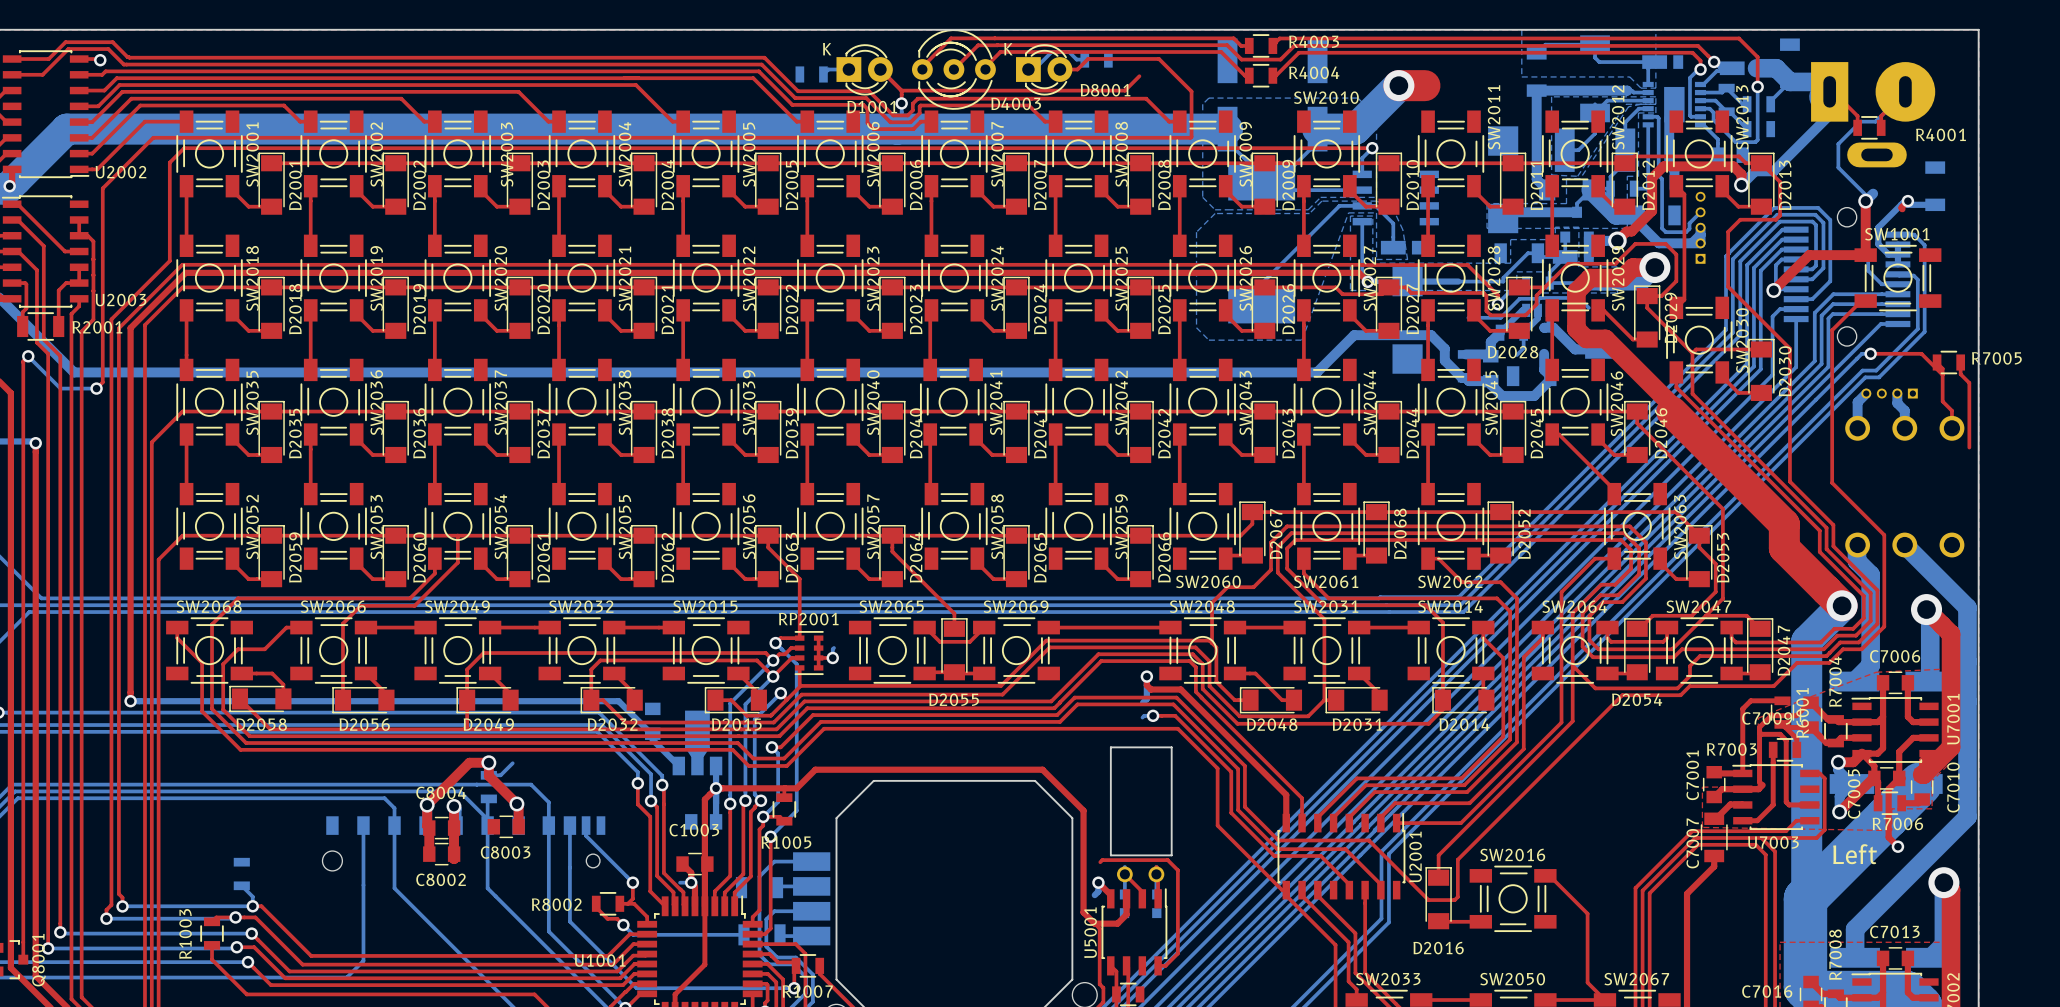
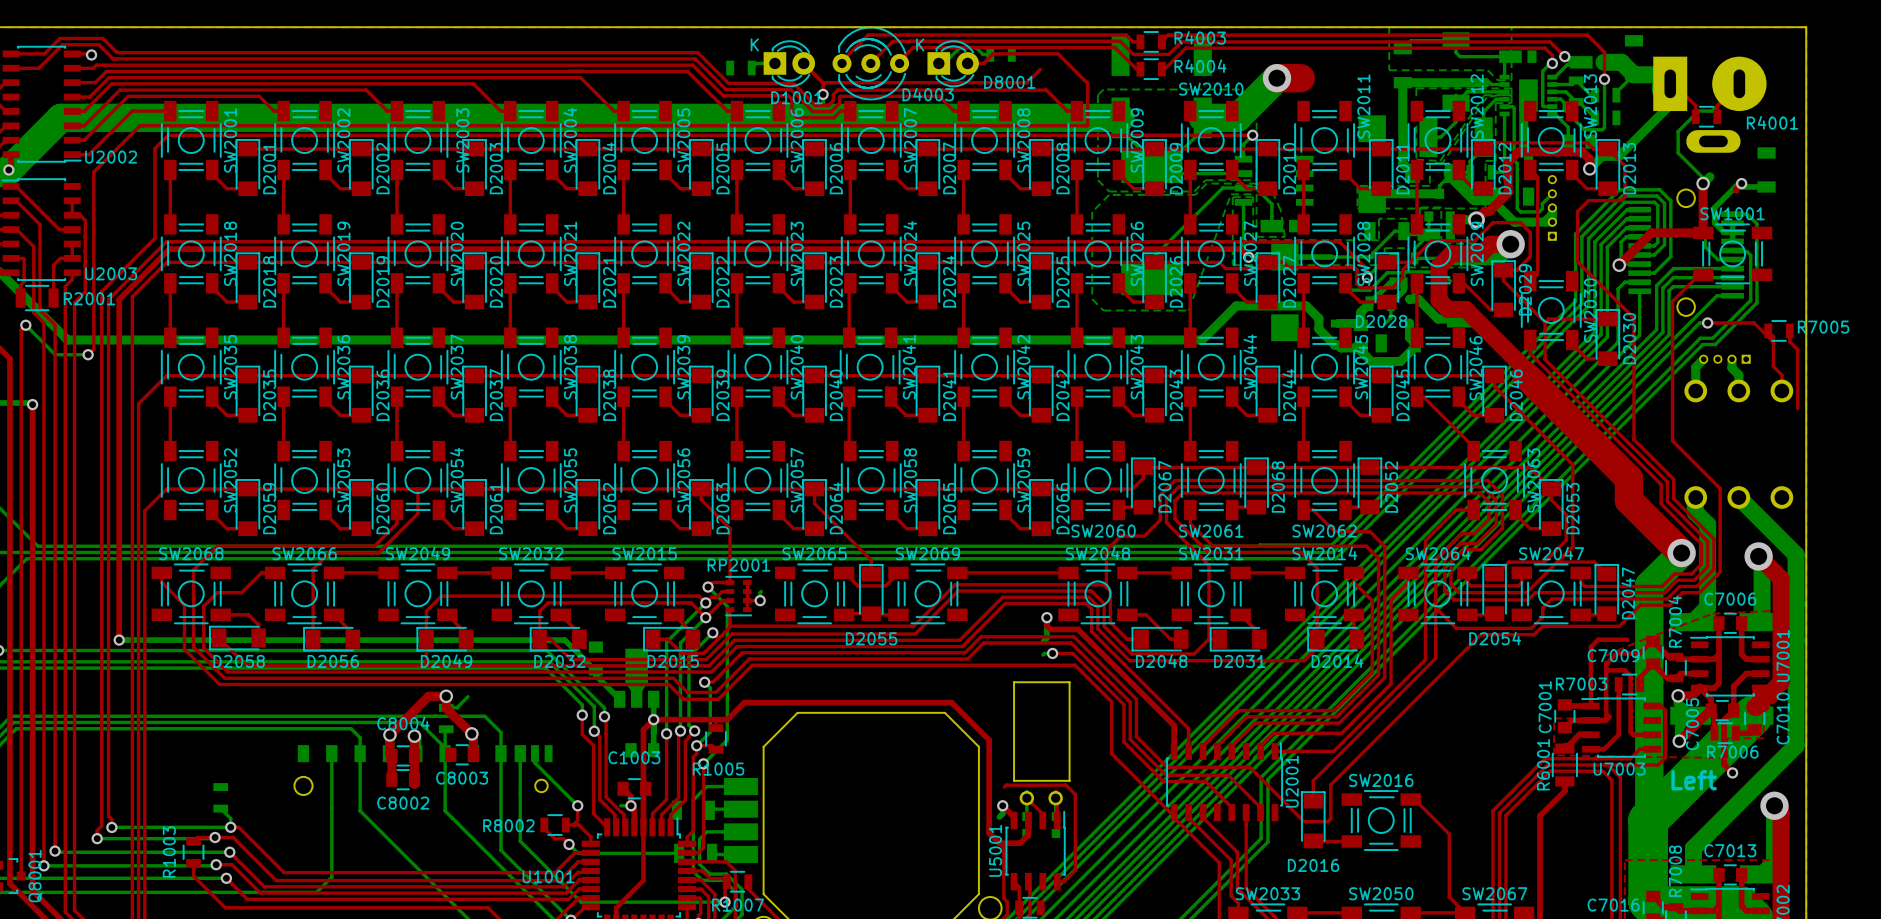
R6001 footprint: [1770, 696, 1795, 729] -> [1552, 743, 1578, 787]
R6001 name position: R6001 (1802, 712) -> R6001 (1543, 764)
top track: (1782, 724) (1796, 738) (1796, 741) -> none
top track: (1785, 727) (1811, 727) -> (1640, 677) (1653, 664)
C7007: (1714, 837) -> none

